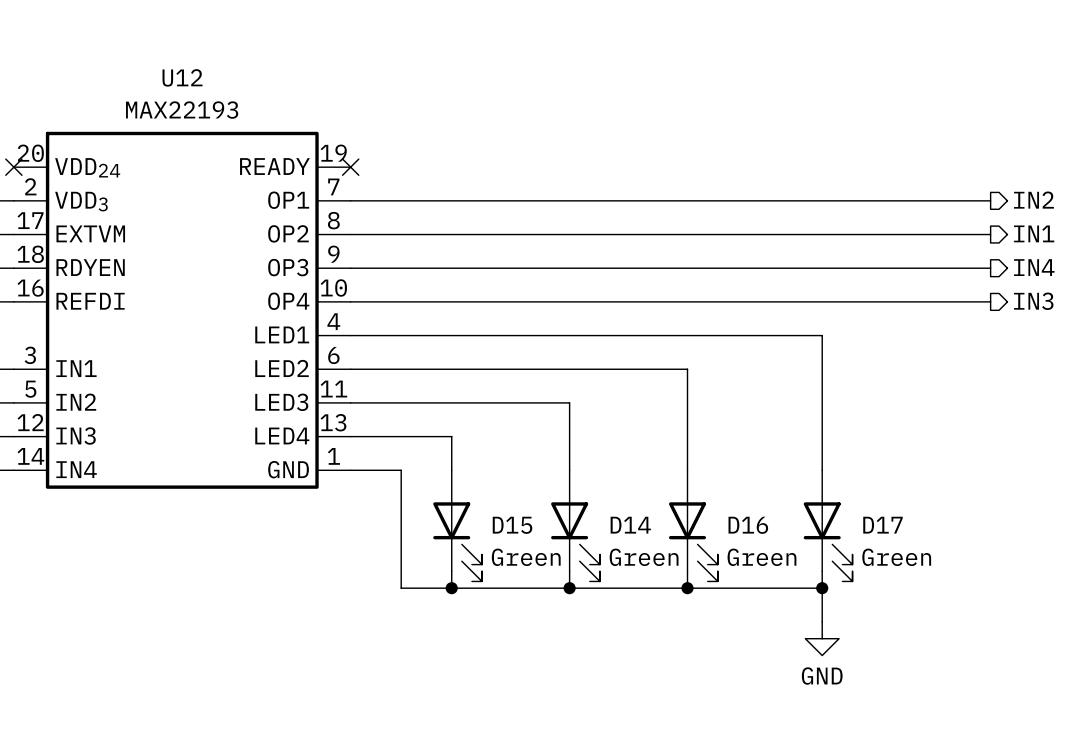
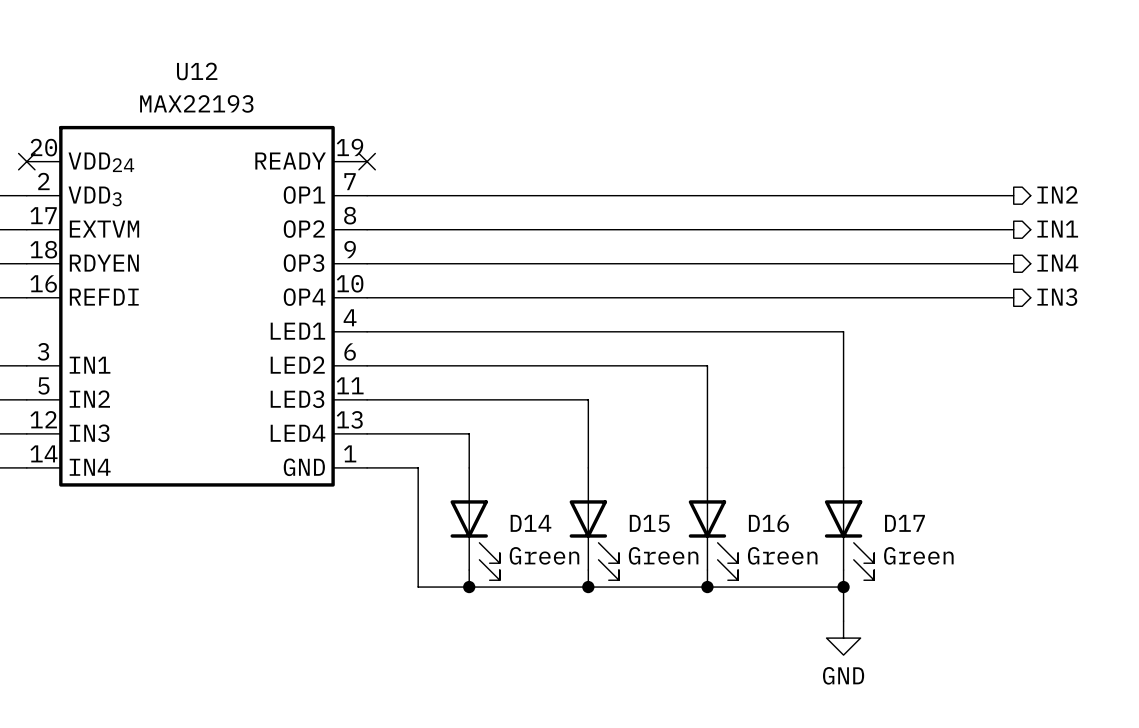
D15 name: D15 (512, 525) -> D14 (530, 523)
D14 name: D14 (630, 525) -> D15 (649, 523)

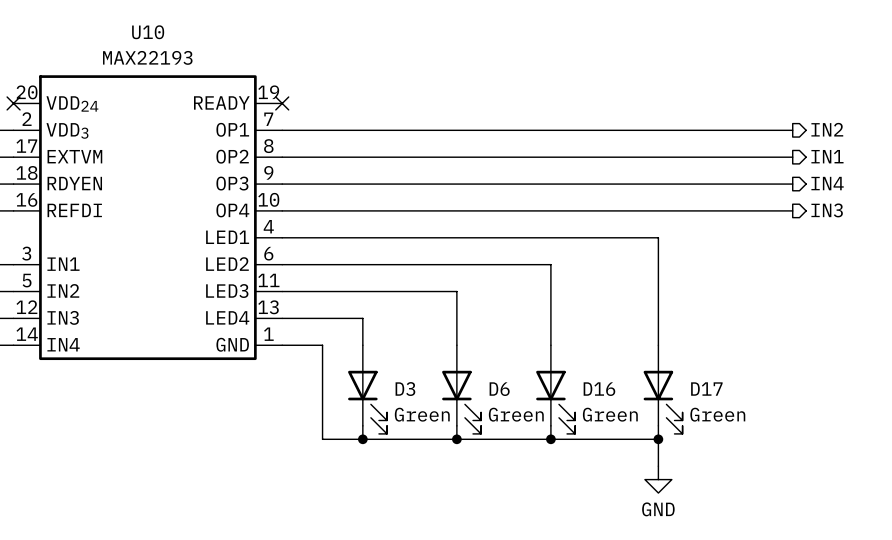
U12 name: U12 (197, 71) -> U10 (148, 32)
D14 name: D14 (530, 523) -> D3 (405, 389)
D15 name: D15 (649, 523) -> D6 (499, 389)

